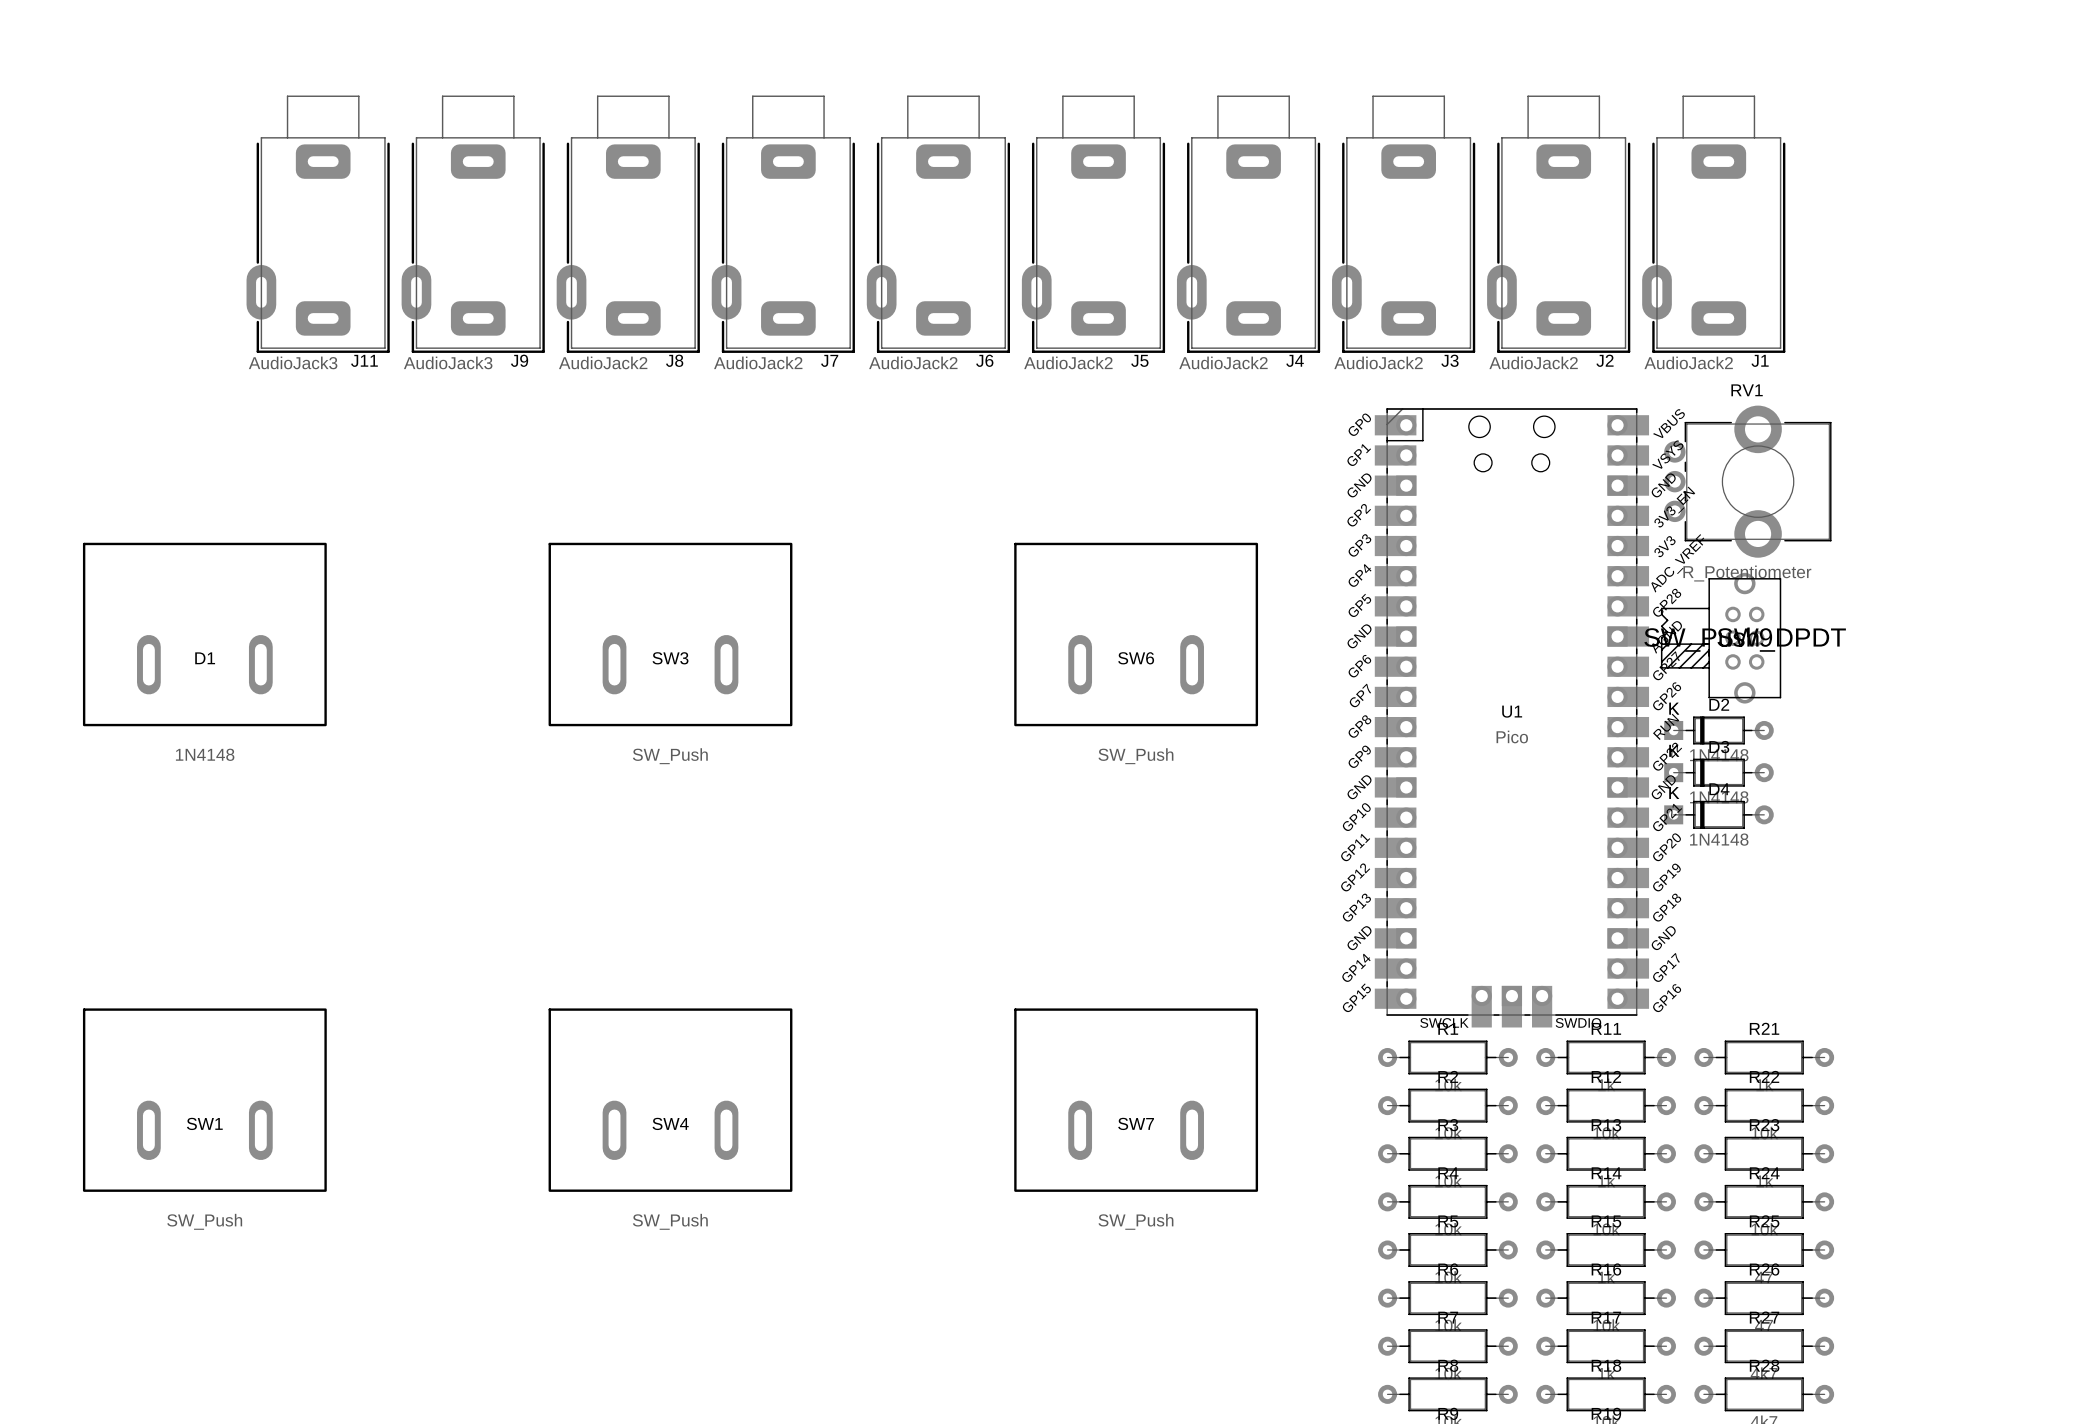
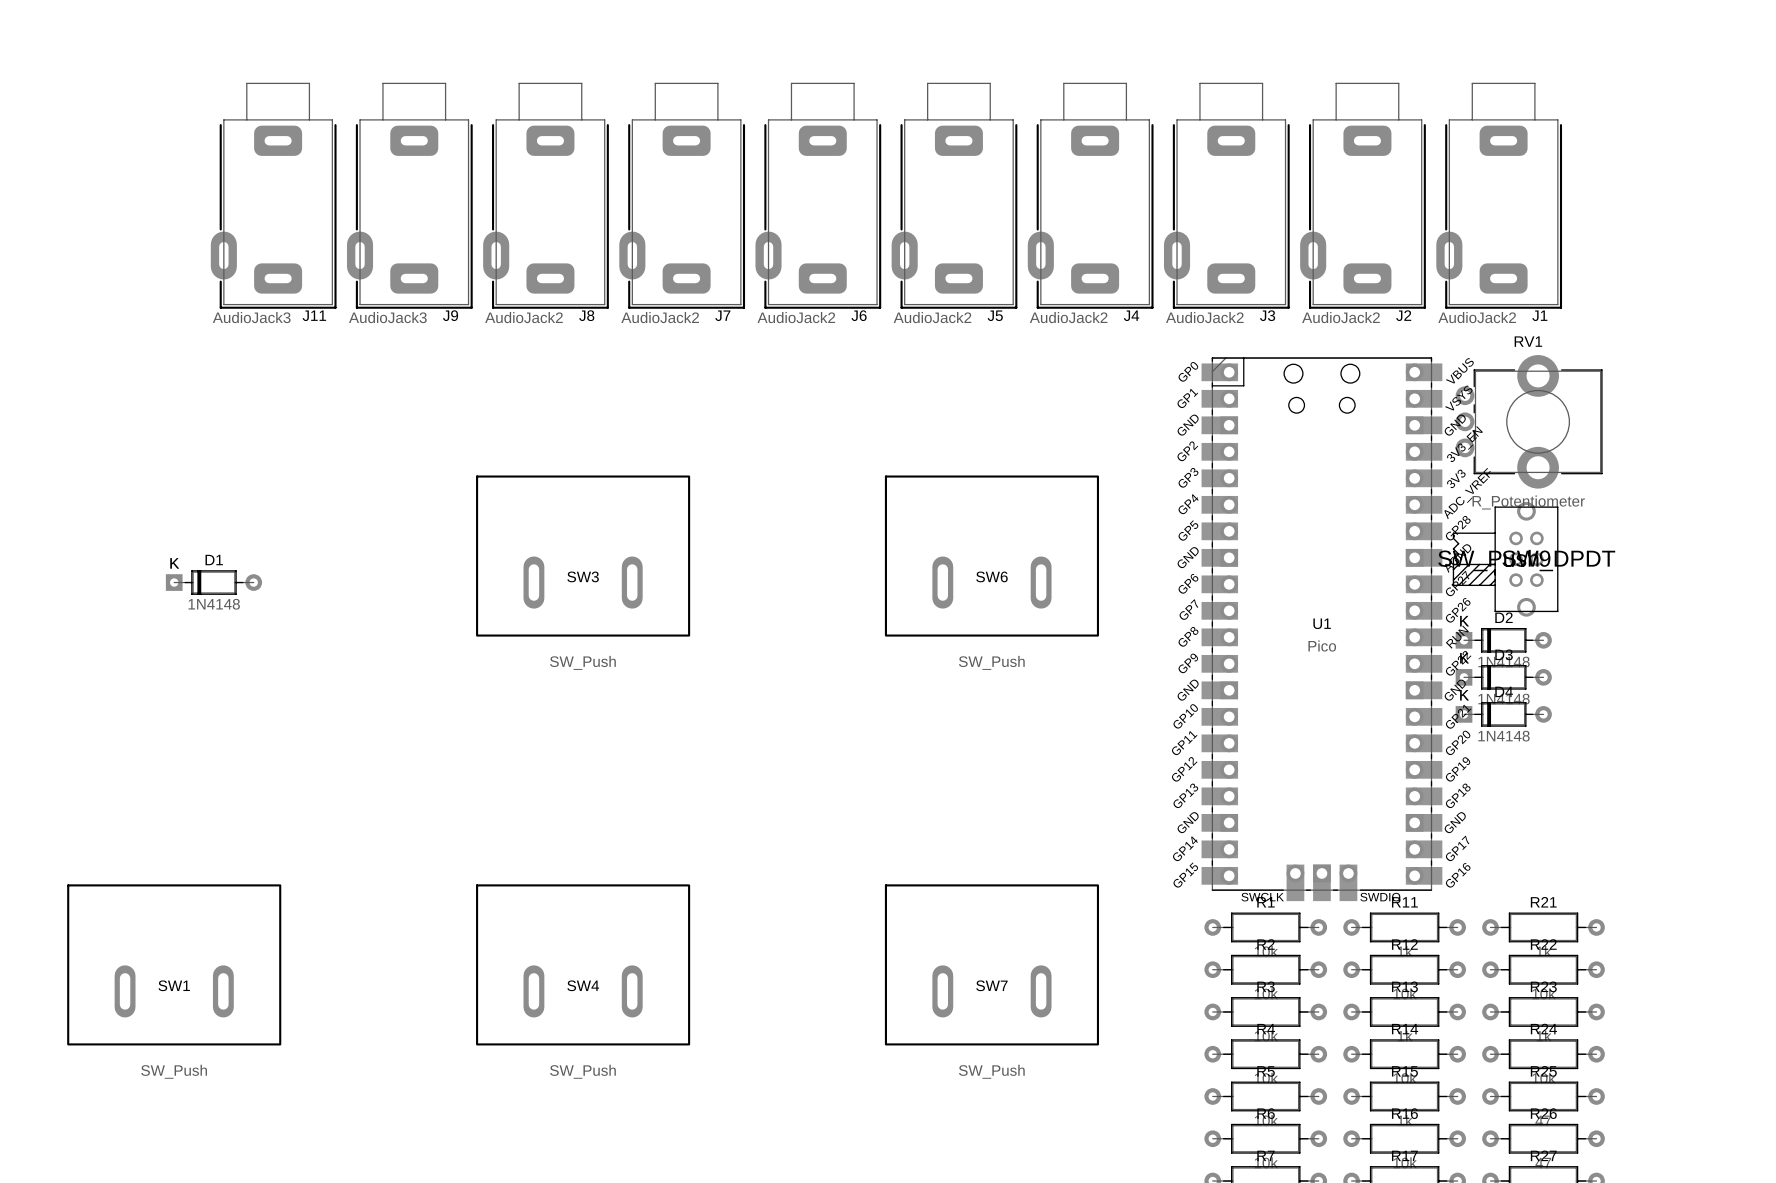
D1 footprint: [82, 542, 327, 727] -> [165, 570, 263, 595]
D1 name position: D1 (205, 658) -> D1 (214, 560)
D1 value position: 1N4148 (205, 754) -> 1N4148 (214, 604)

